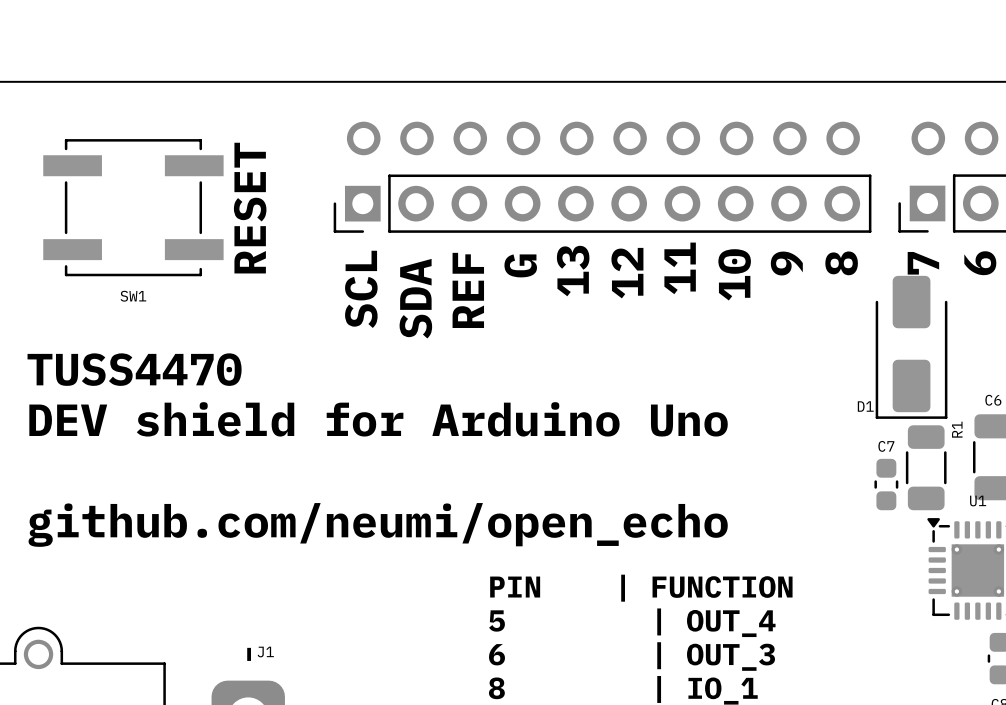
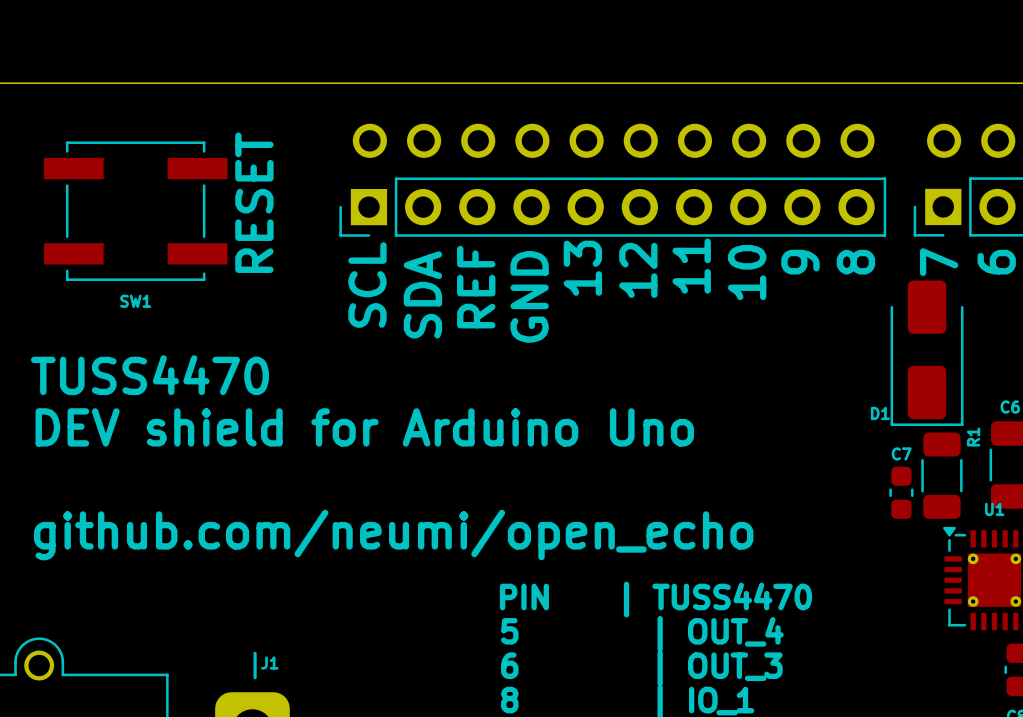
text: G (520, 265) -> none
text: none -> GND (529, 296)
text: PIN | FUNCTION (641, 588) -> PIN | TUSS4470 (655, 599)

